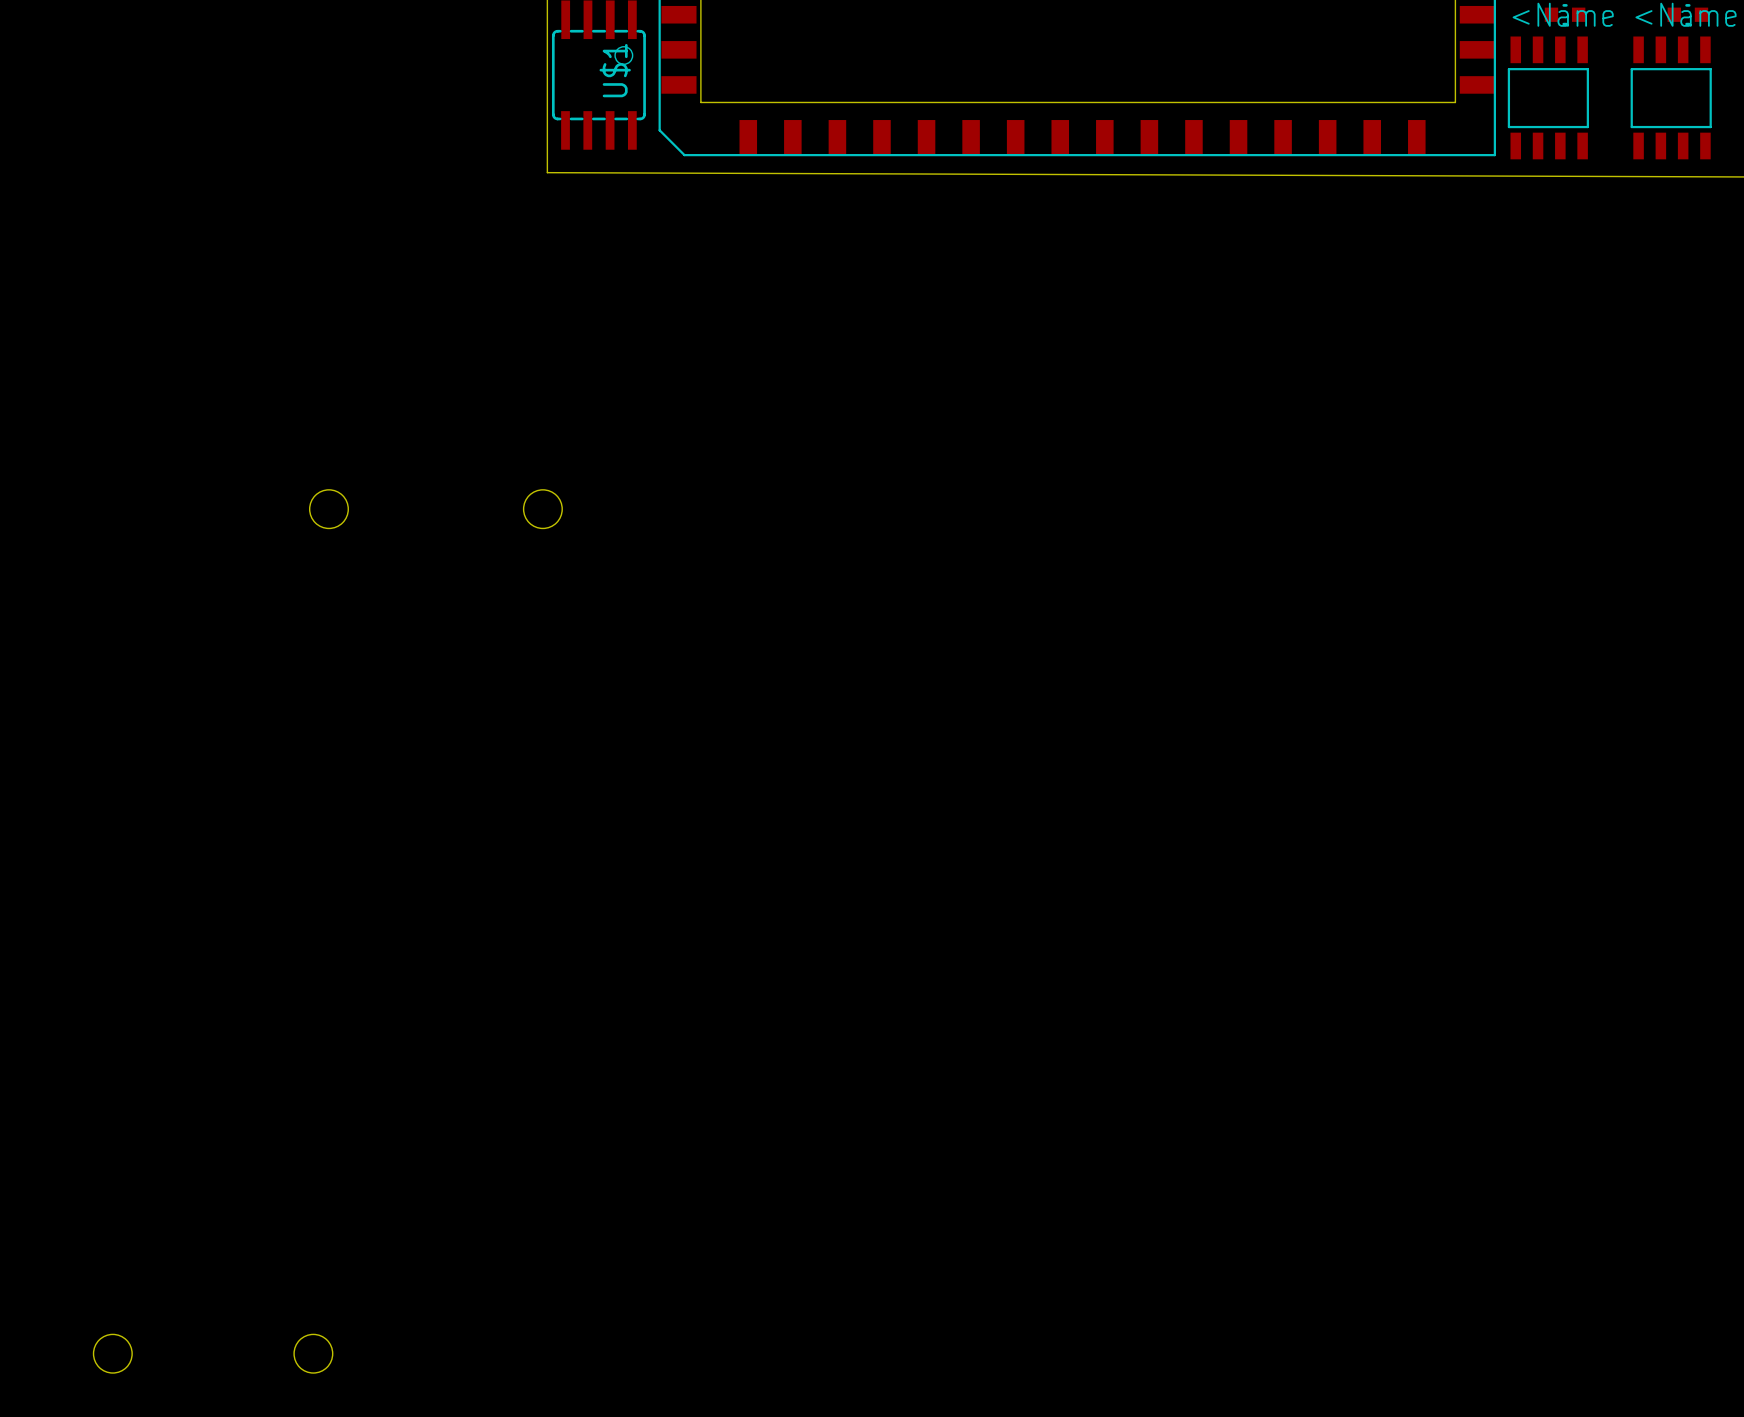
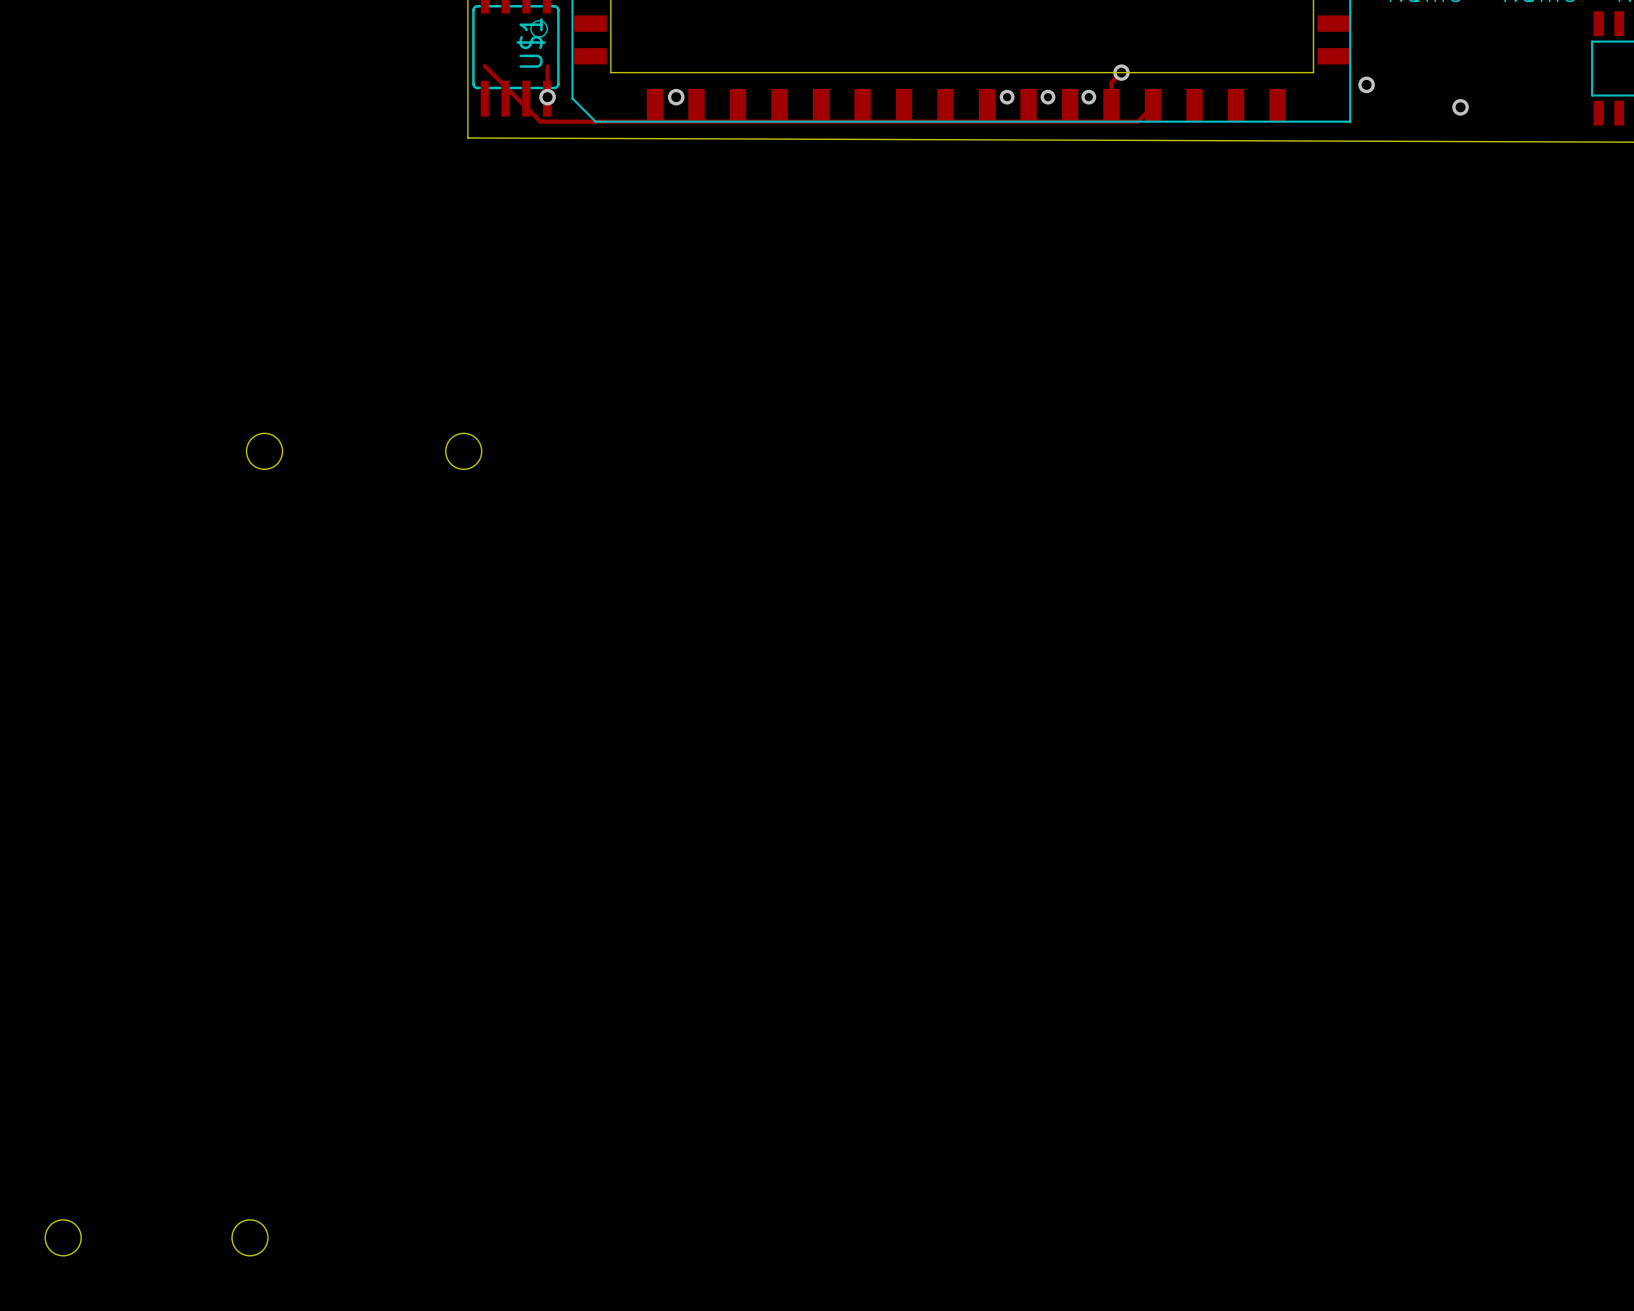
track: none -> (484, 65) (540, 121) (1137, 121) (1153, 106) (1153, 97)
track: none -> (547, 66) (547, 97)
part: (1548, 97) -> none
part: (1671, 97) -> none
track: none -> (1121, 72) (1111, 82) (1111, 97)
via: none -> (1121, 72)
via: none -> (1366, 84)
via: none -> (547, 97)
via: none -> (676, 97)
via: none -> (1007, 97)
via: none -> (1047, 97)
via: none -> (1088, 97)
via: none -> (1460, 107)

